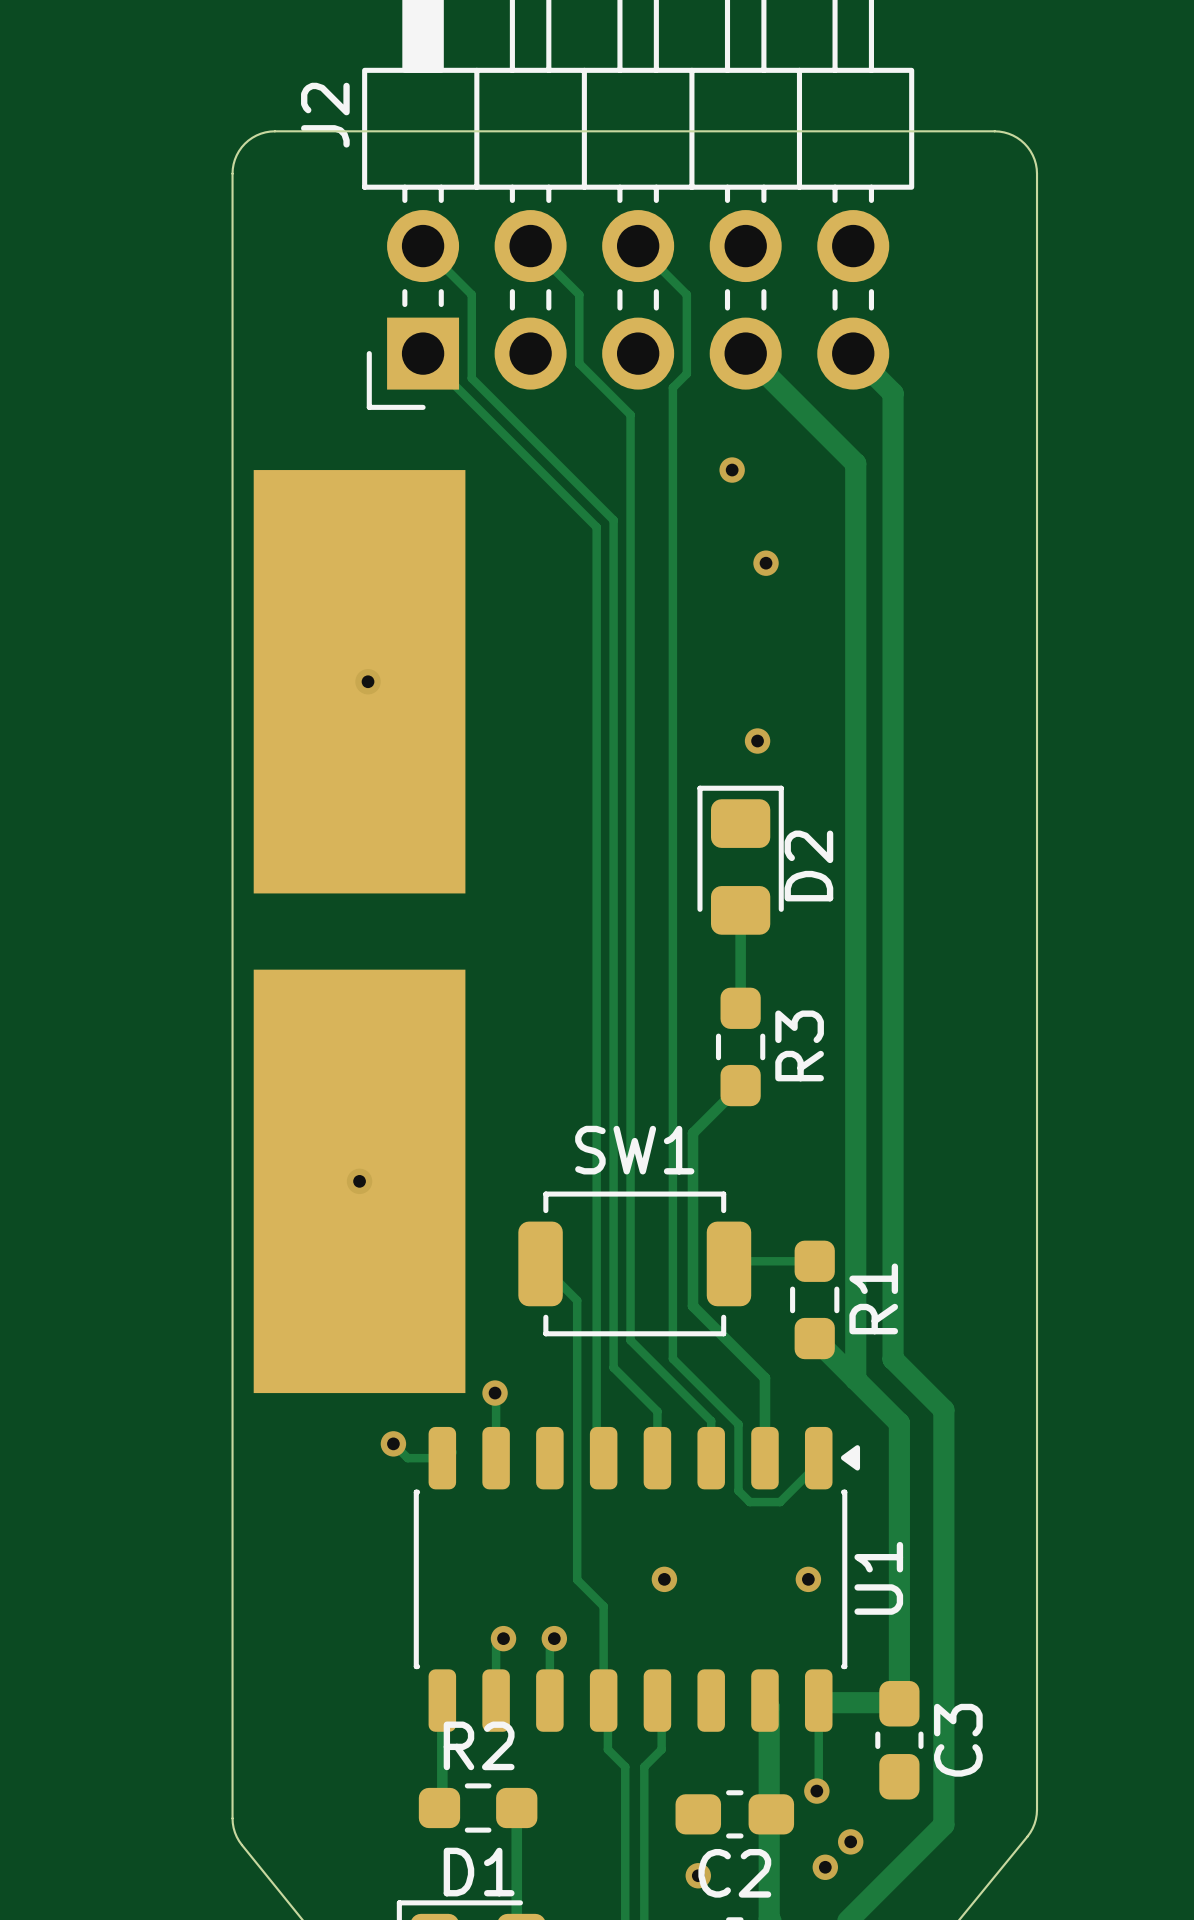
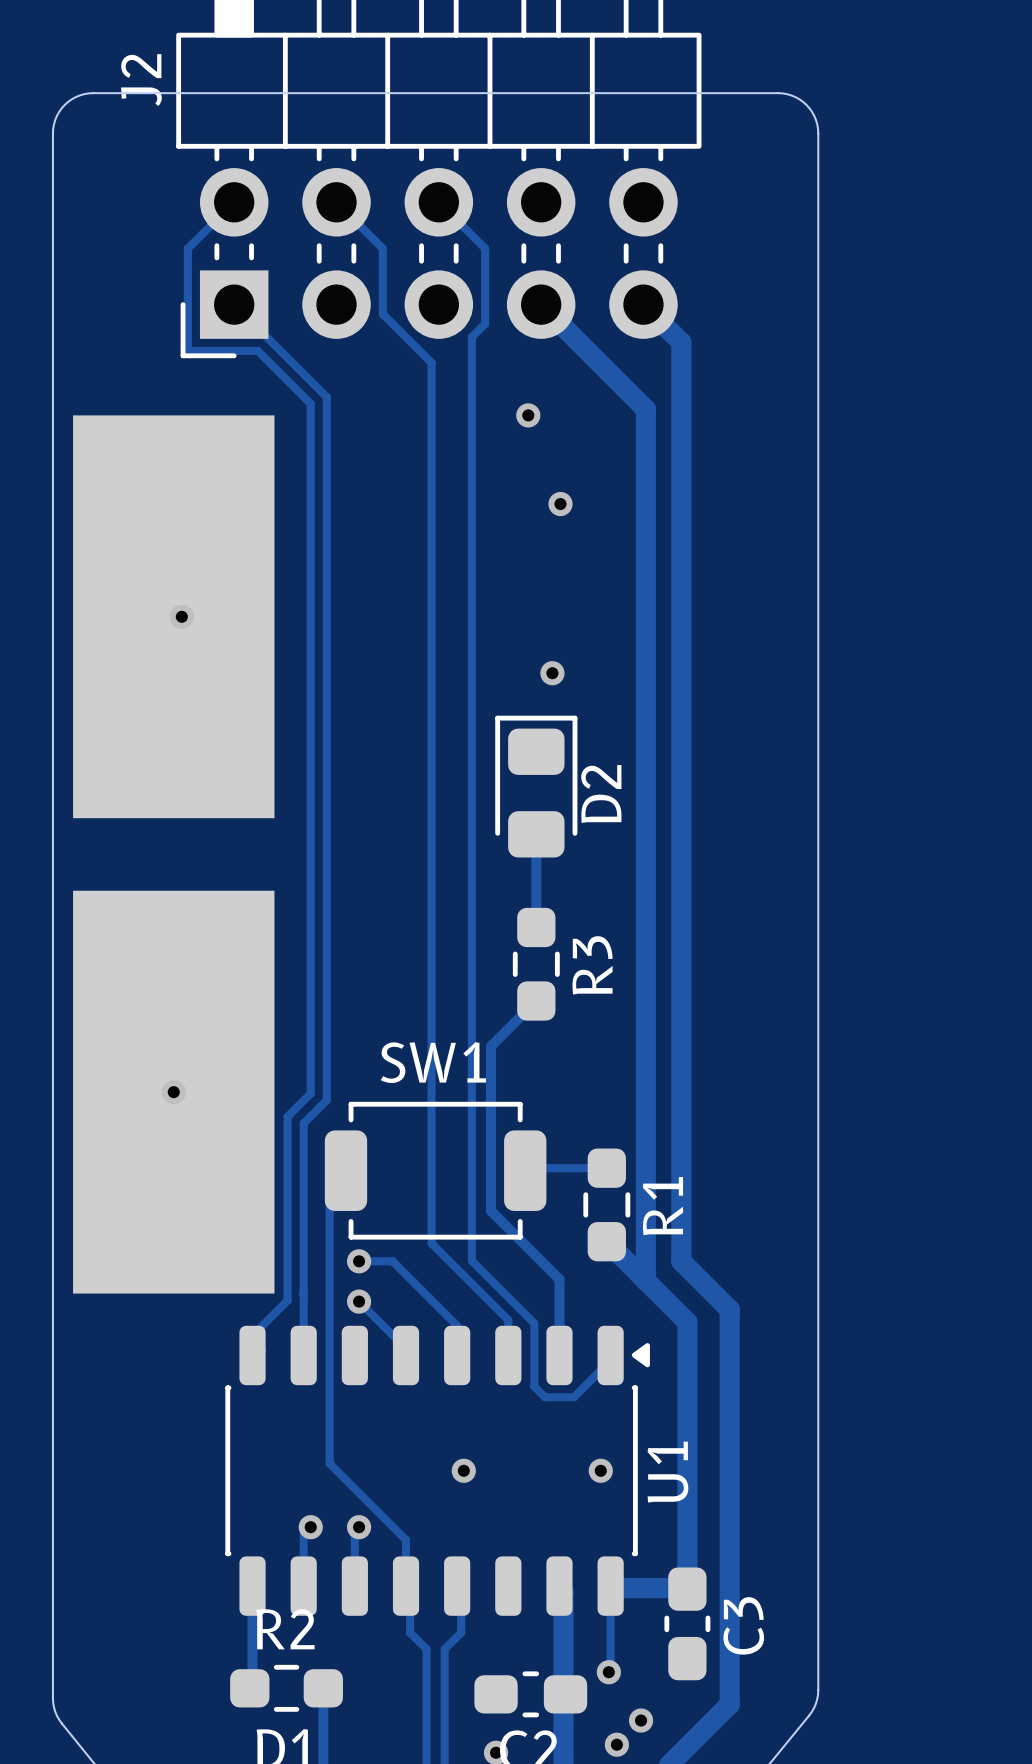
track: (423, 246) (471, 294) (471, 378) (613, 520) (613, 1367) (657, 1411) (657, 1426) -> (234, 202) (187, 248) (187, 350) (257, 350) (310, 403) (310, 1093) (287, 1116) (287, 1300) (252, 1335) (252, 1355)
track: (520, 450) (596, 527) (596, 1451) -> (326, 397) (326, 1100) (303, 1123) (303, 1294)
track: (540, 1263) (577, 1300) (577, 1579) (603, 1606) (603, 1652) -> (345, 1170) (329, 1187) (329, 1463) (406, 1539)
track: none -> (359, 1261) (392, 1261) (457, 1325)
via: none -> (359, 1261)
via: (495, 1393) -> none
track: none -> (359, 1301) (406, 1348) (406, 1355)
via: none -> (359, 1301)
track: (393, 1443) (407, 1458) (442, 1458) -> none
via: (393, 1443) -> none

